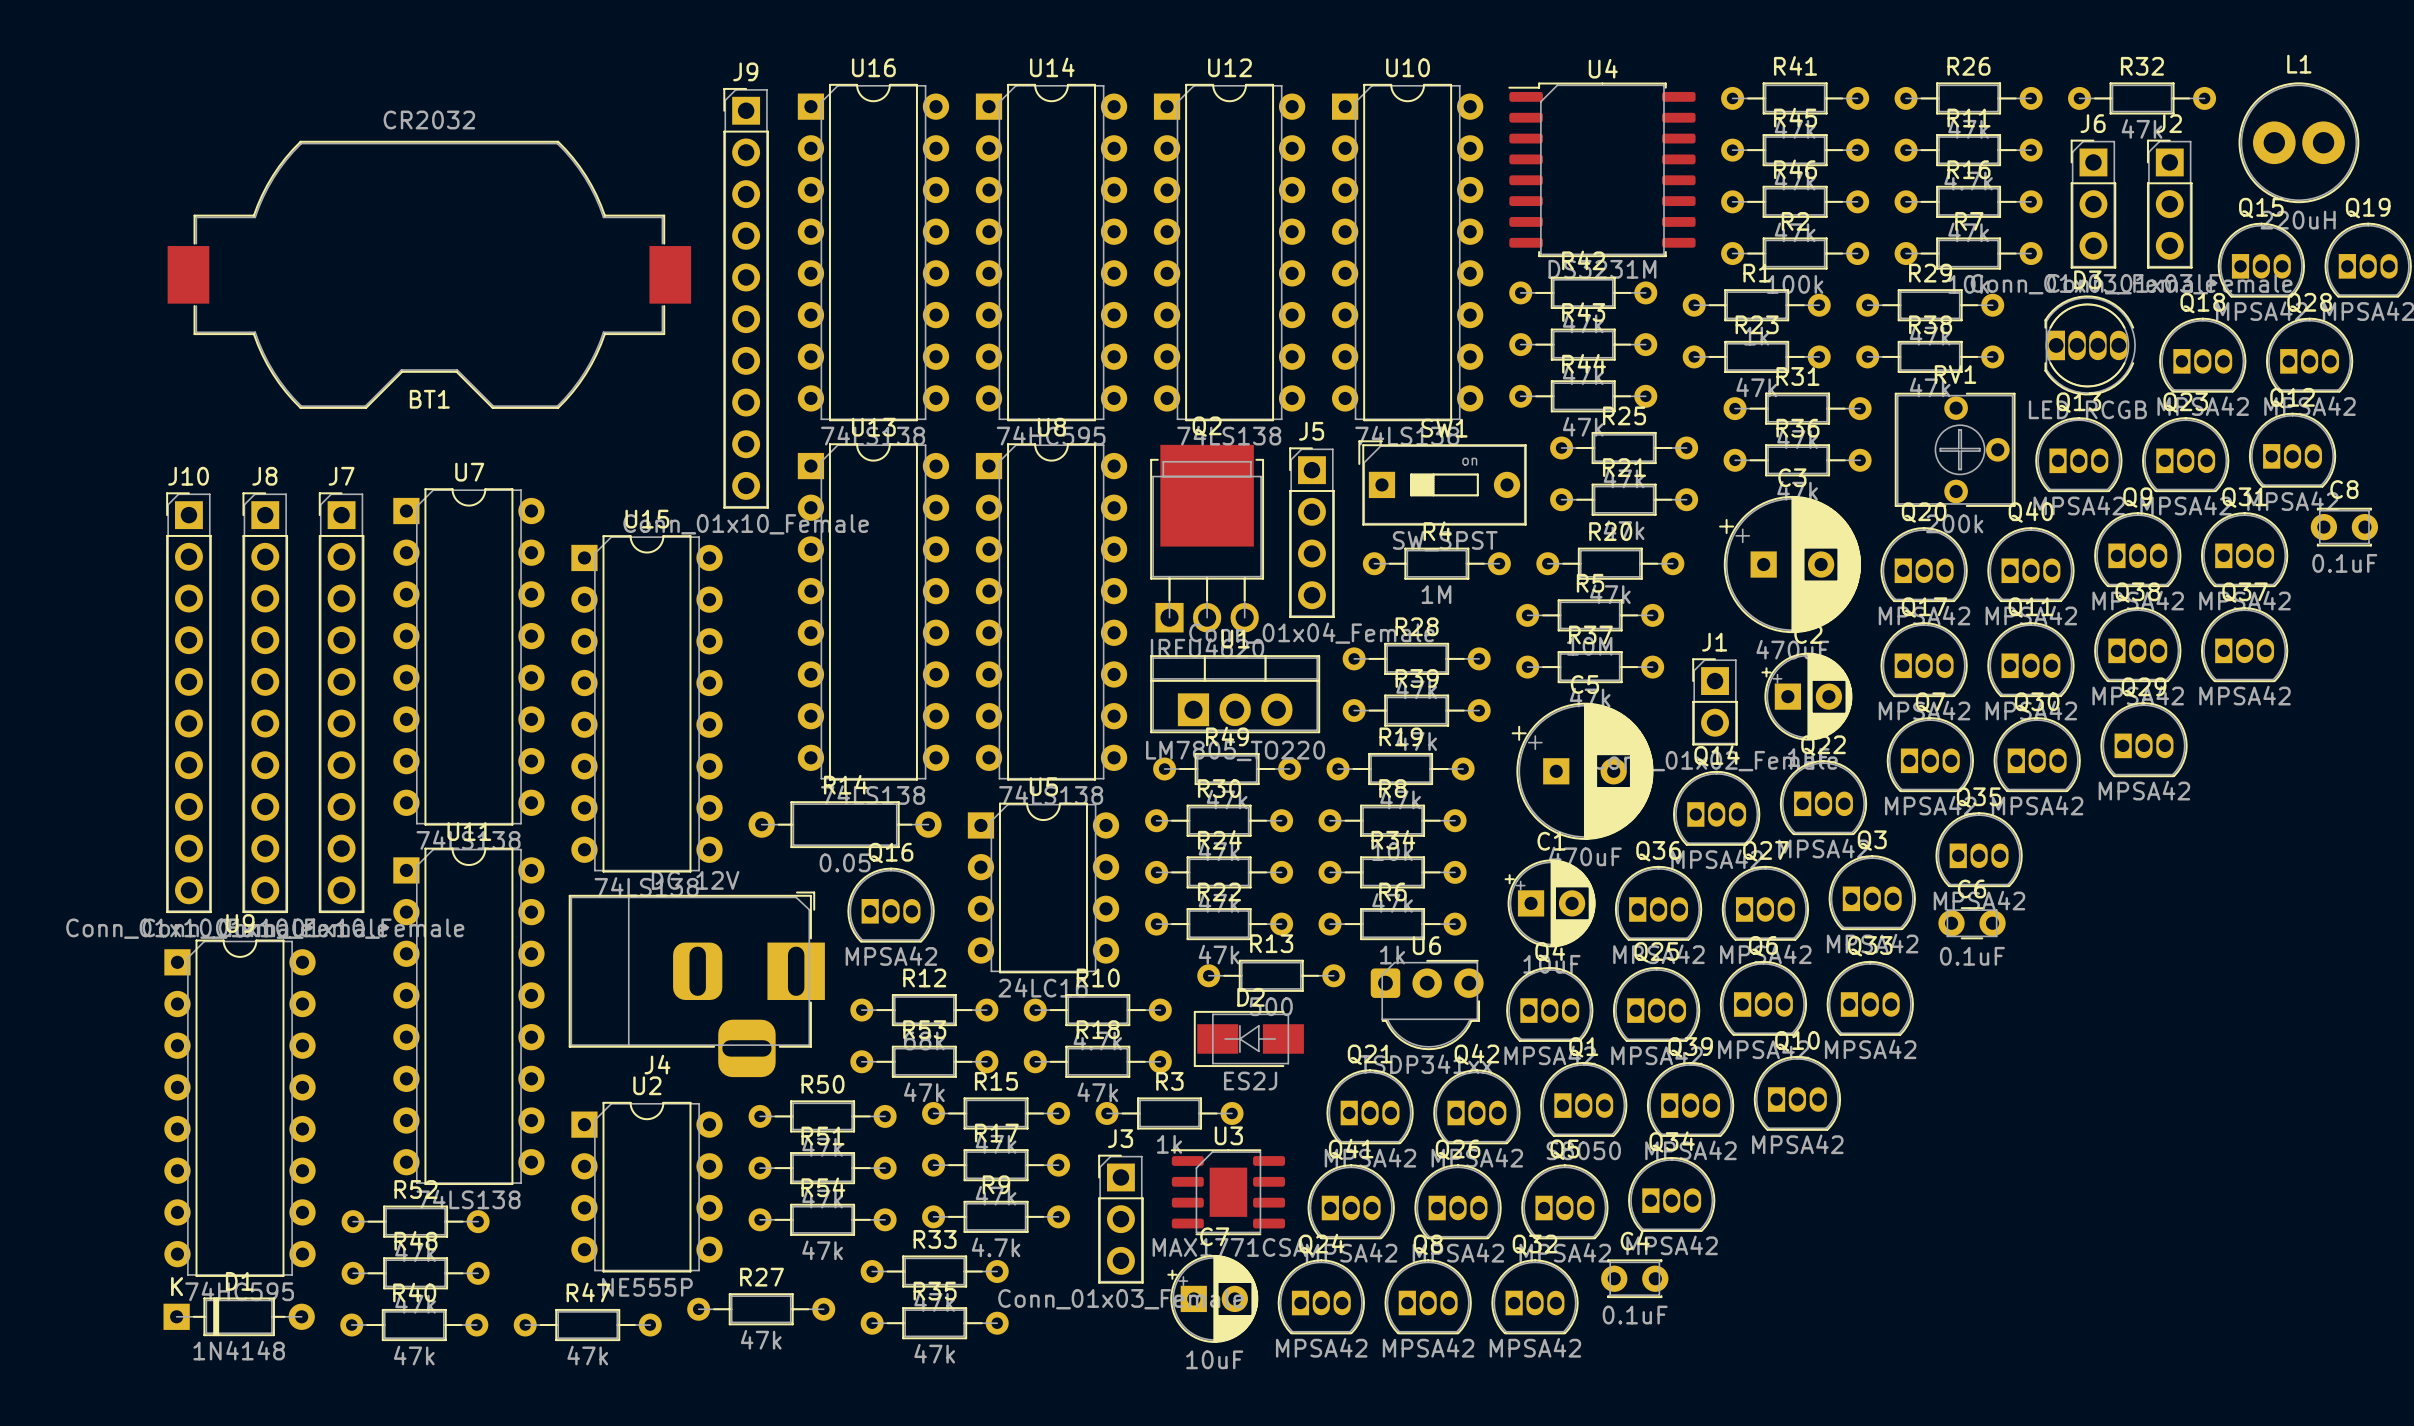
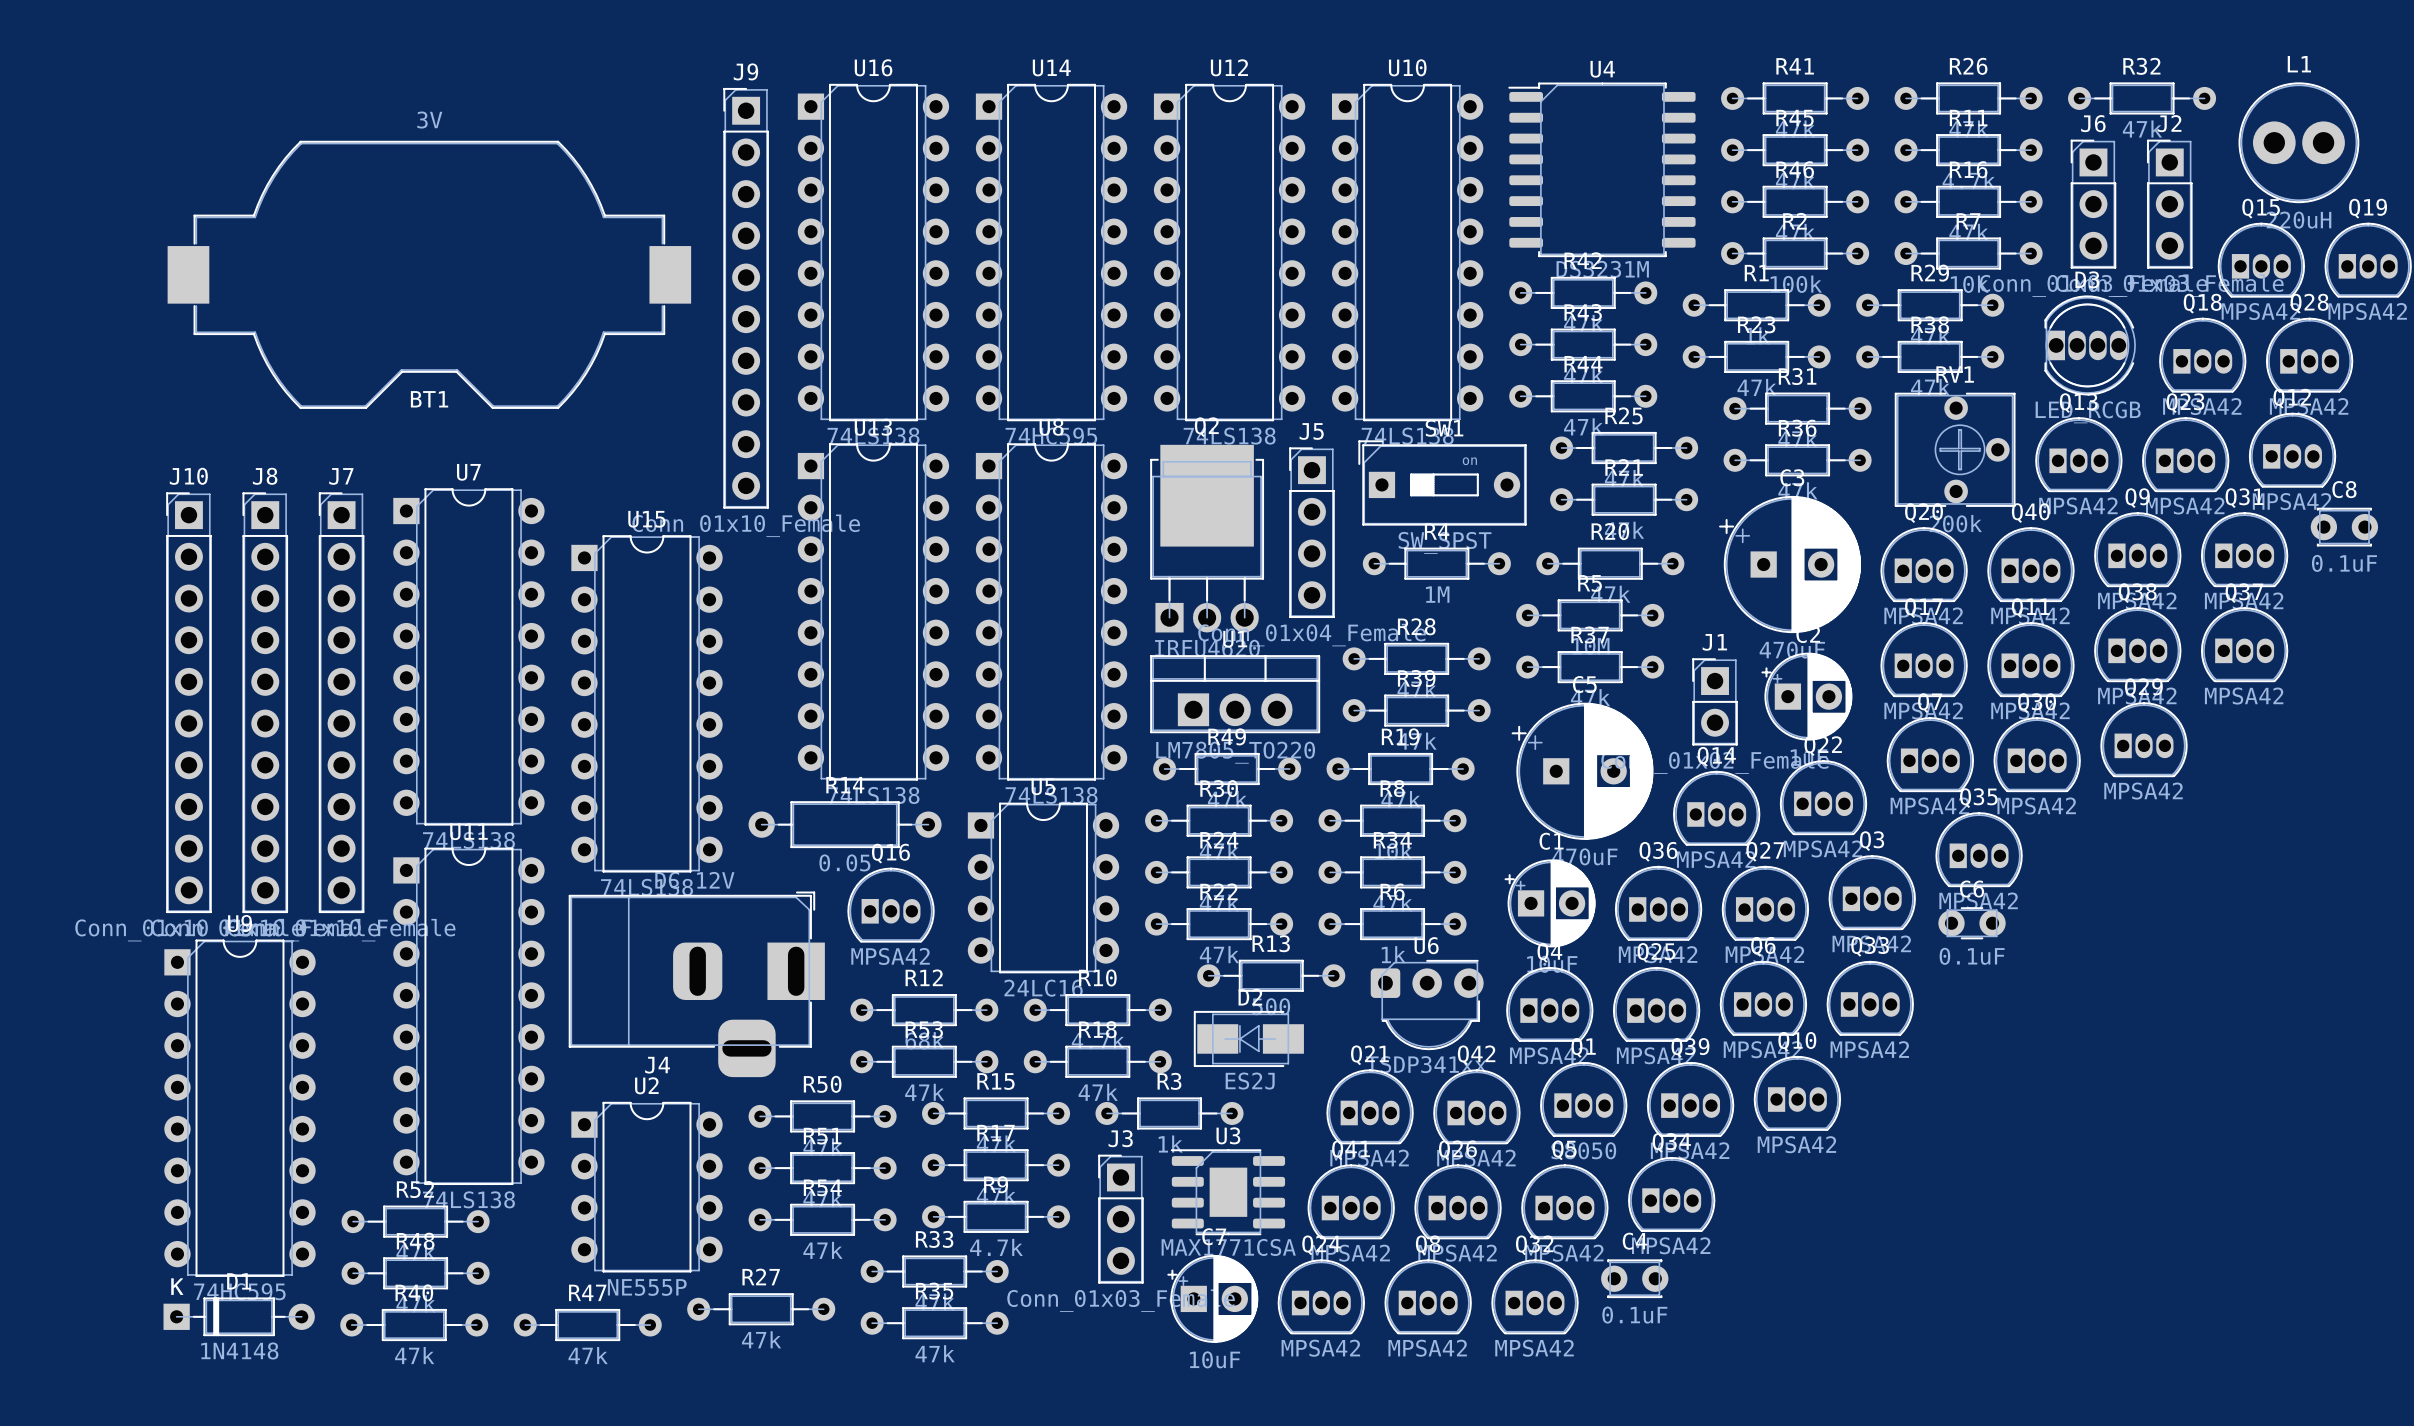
BT1 value: CR2032 (429, 120) -> 3V (429, 120)

